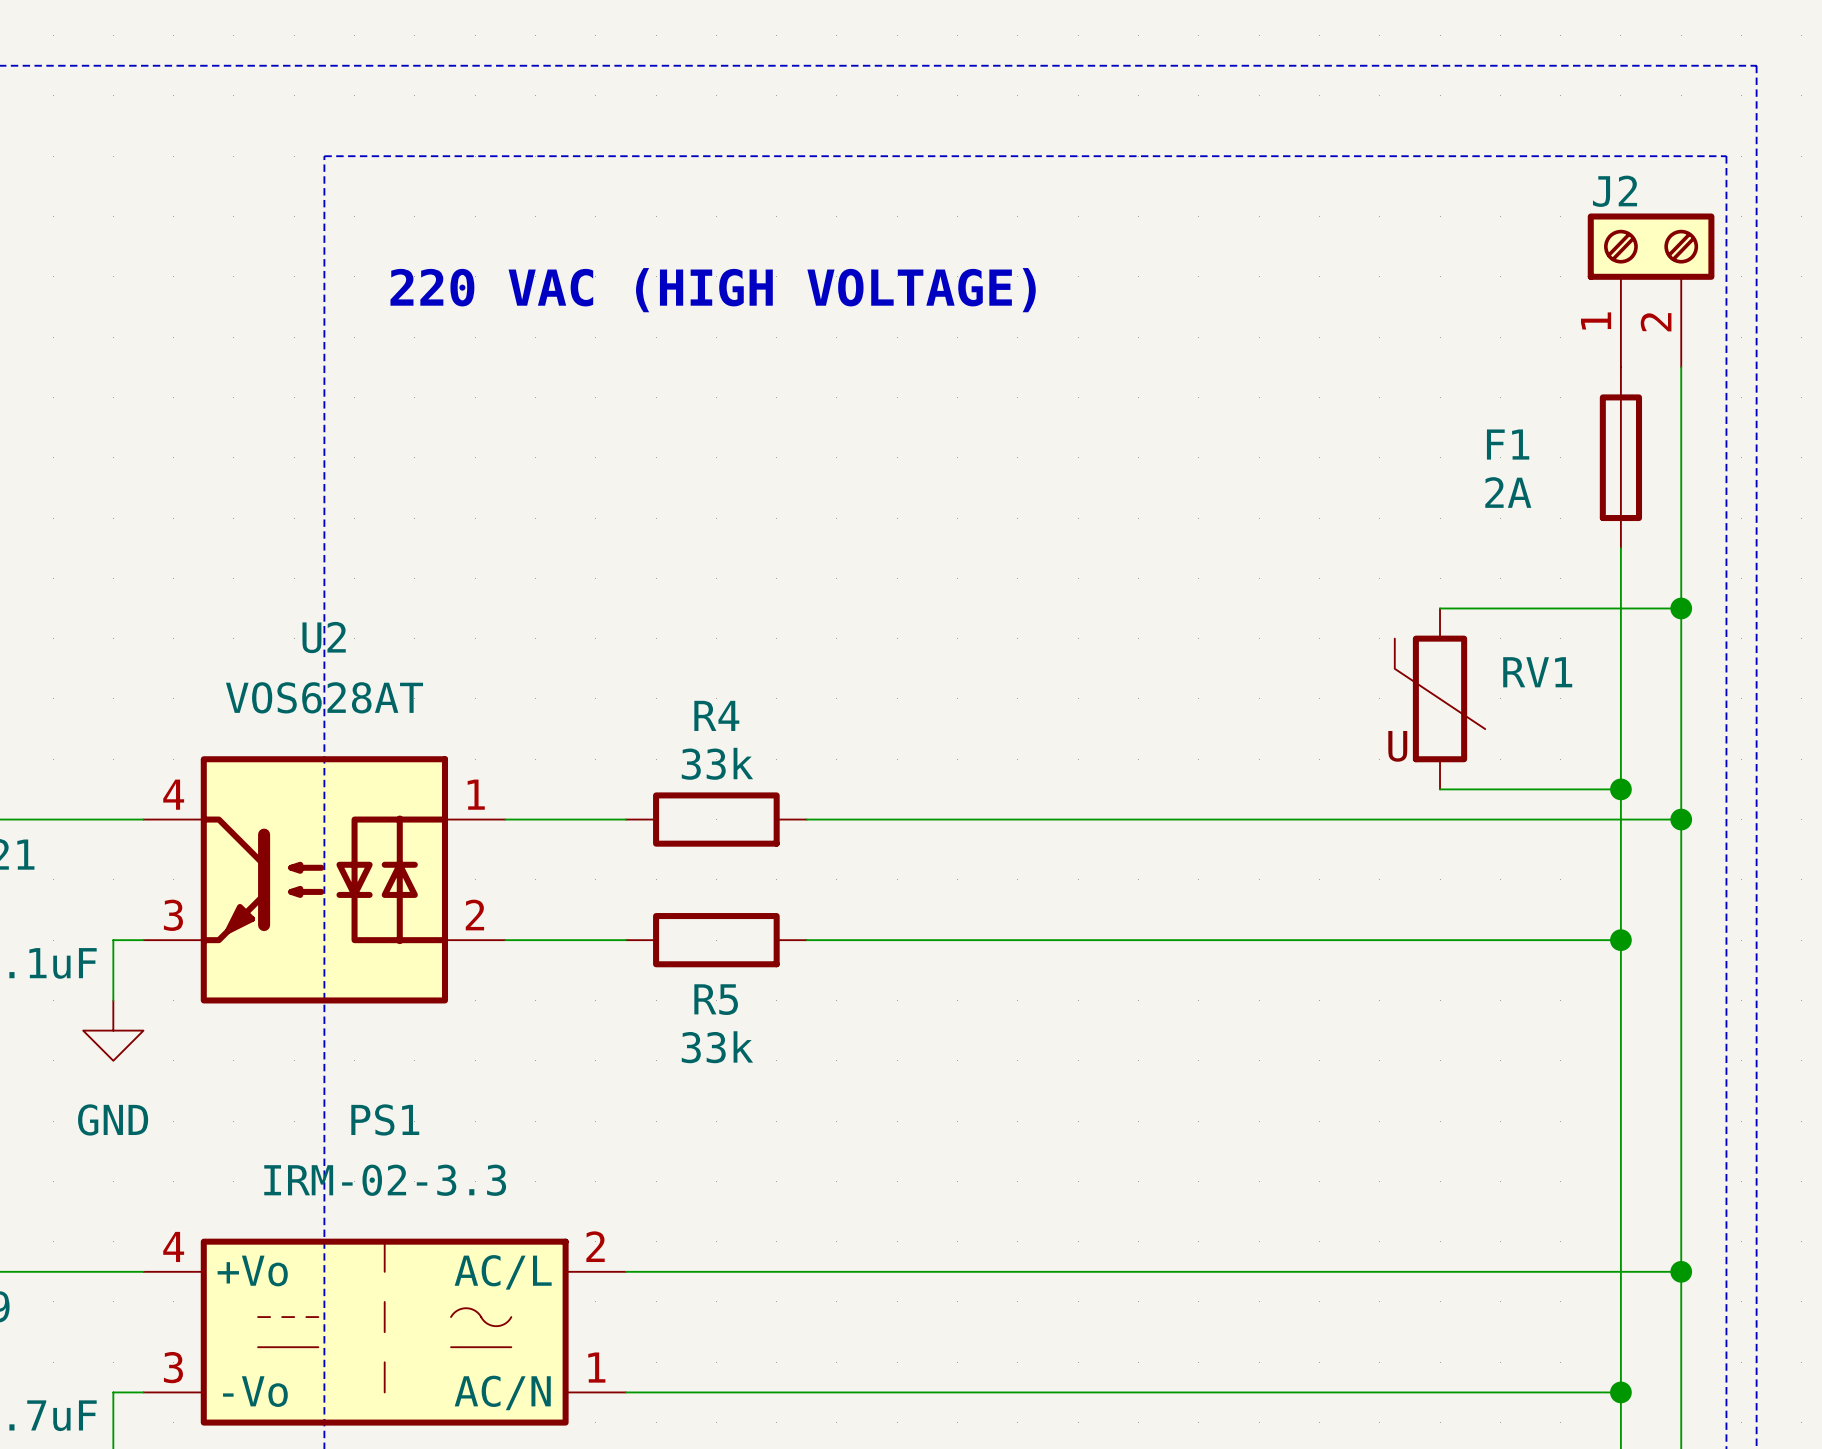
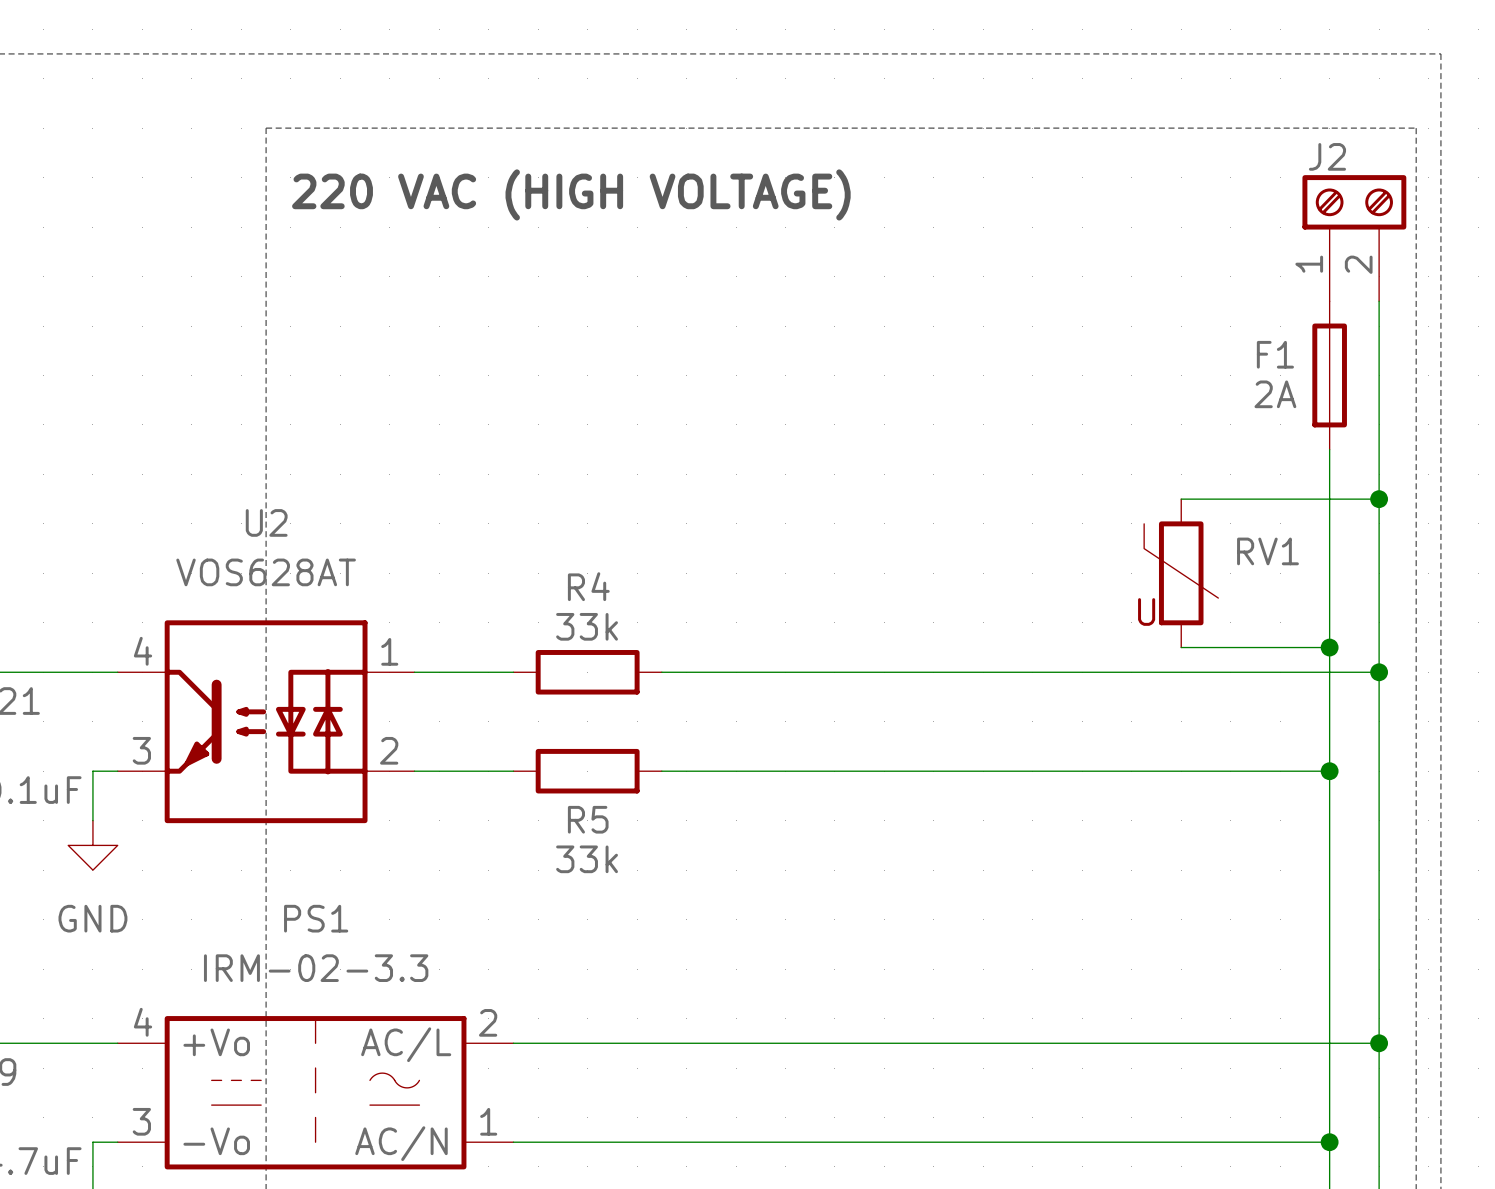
text position: 220 VAC (HIGH VOLTAGE) (713, 290) -> 220 VAC (HIGH VOLTAGE) (571, 194)
F1 name position: F1 (1508, 444) -> F1 (1275, 354)
F1 value position: 2A (1508, 492) -> 2A (1275, 394)

